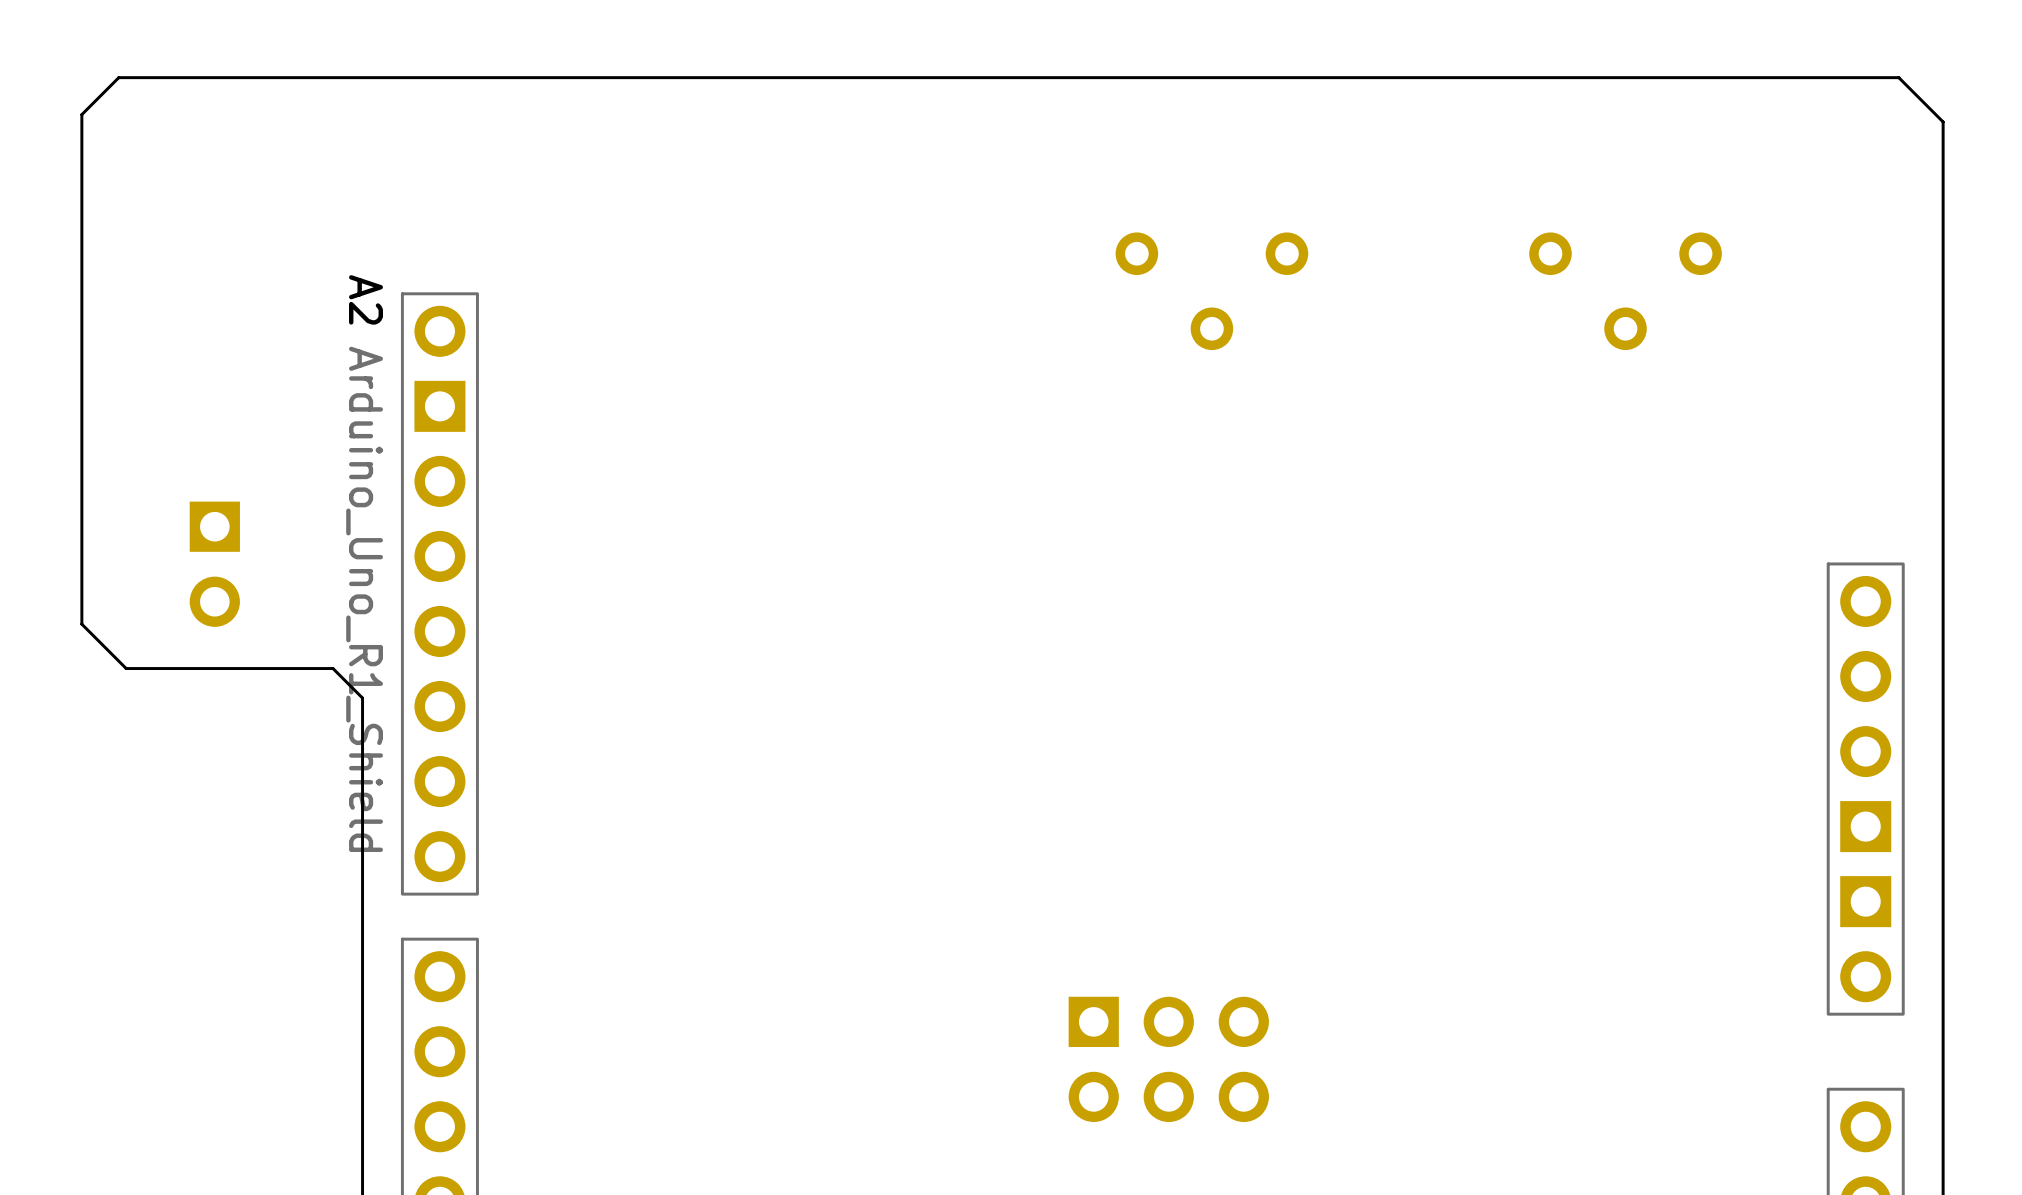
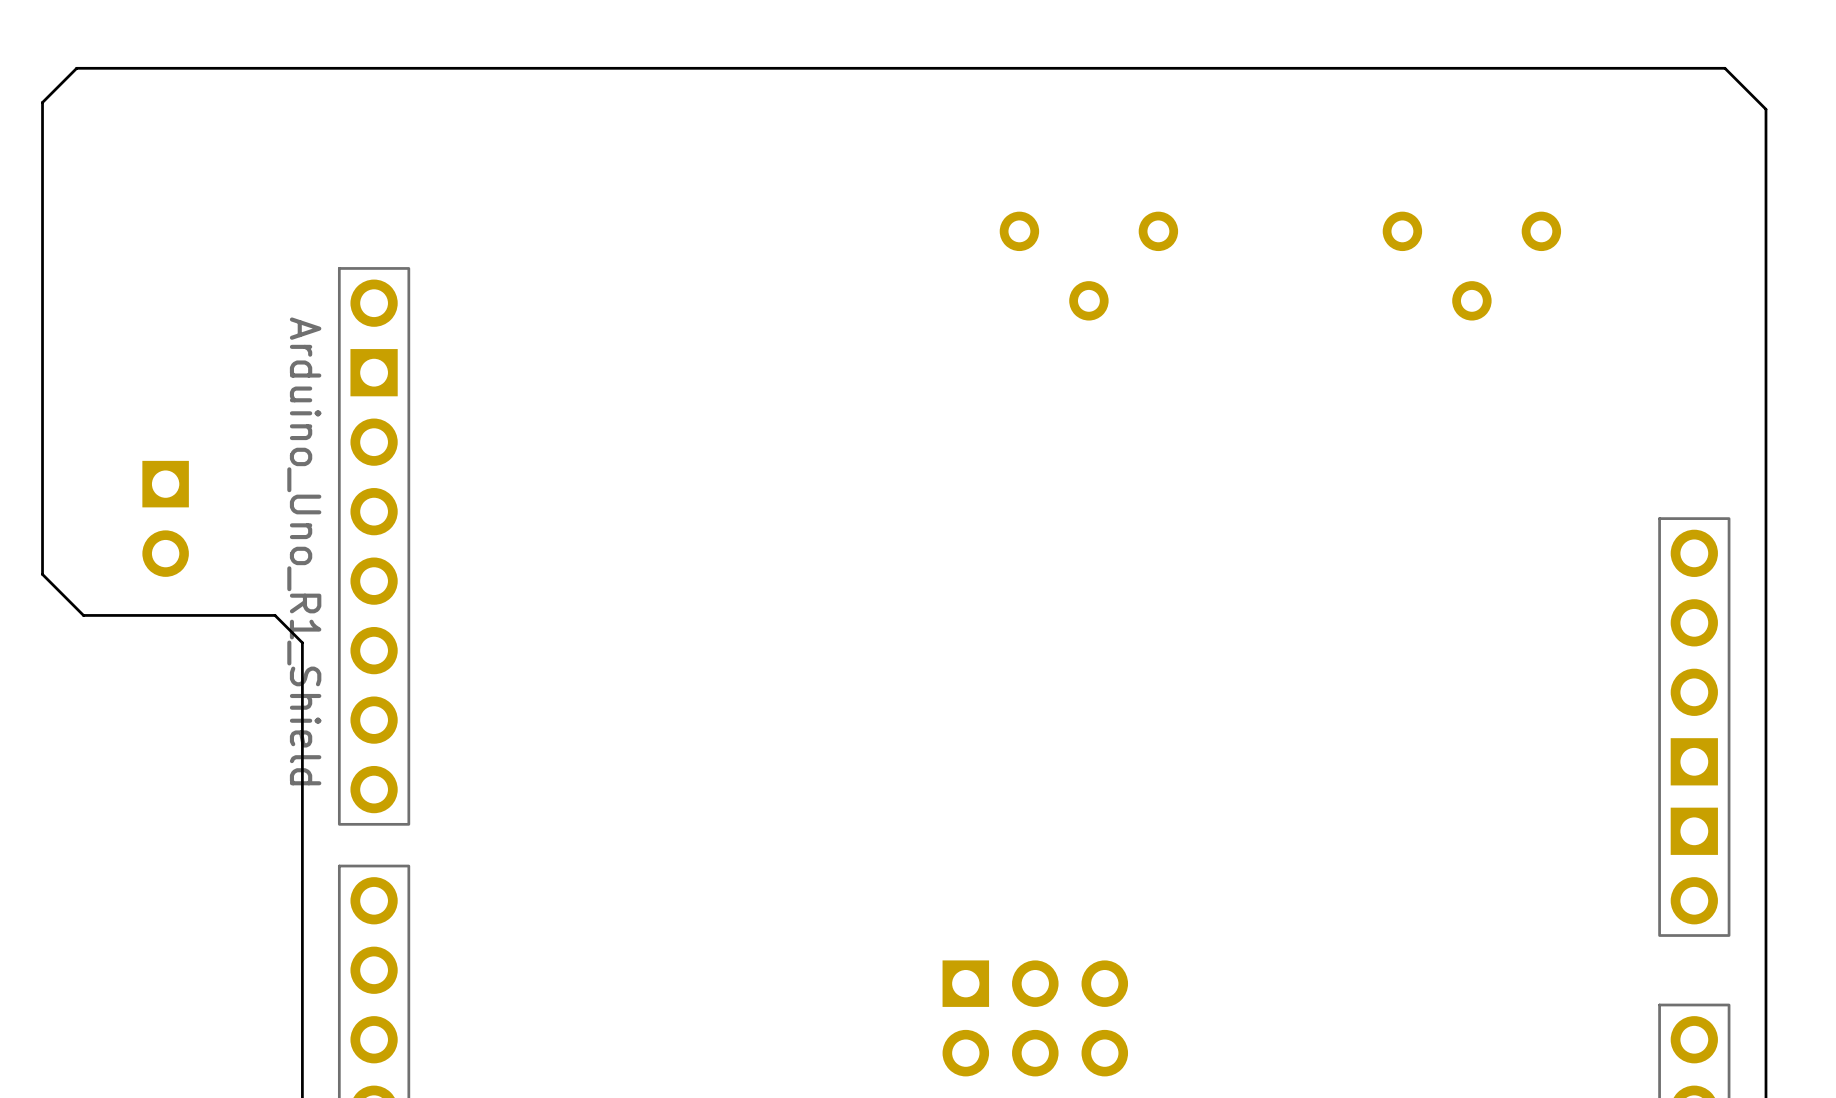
A2 name: A2 (366, 299) -> none
part position: (1168, 1059) -> (1035, 1018)

